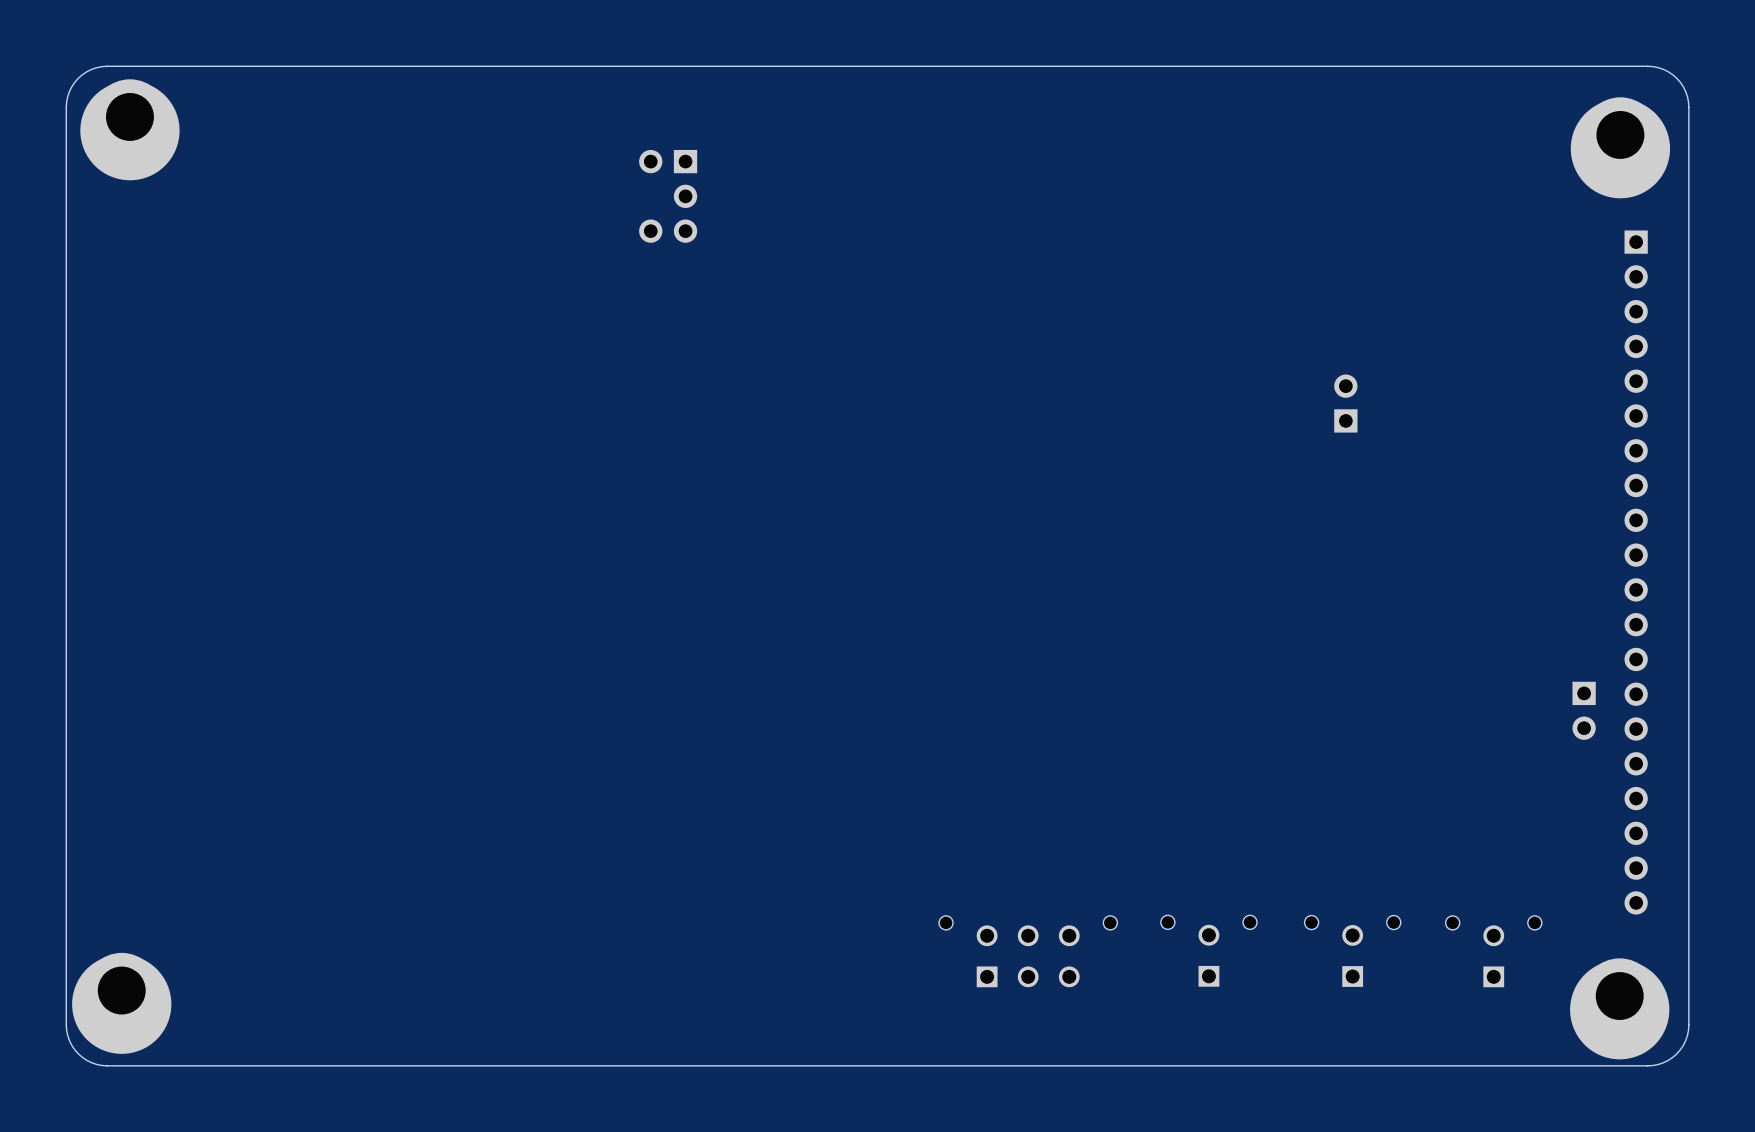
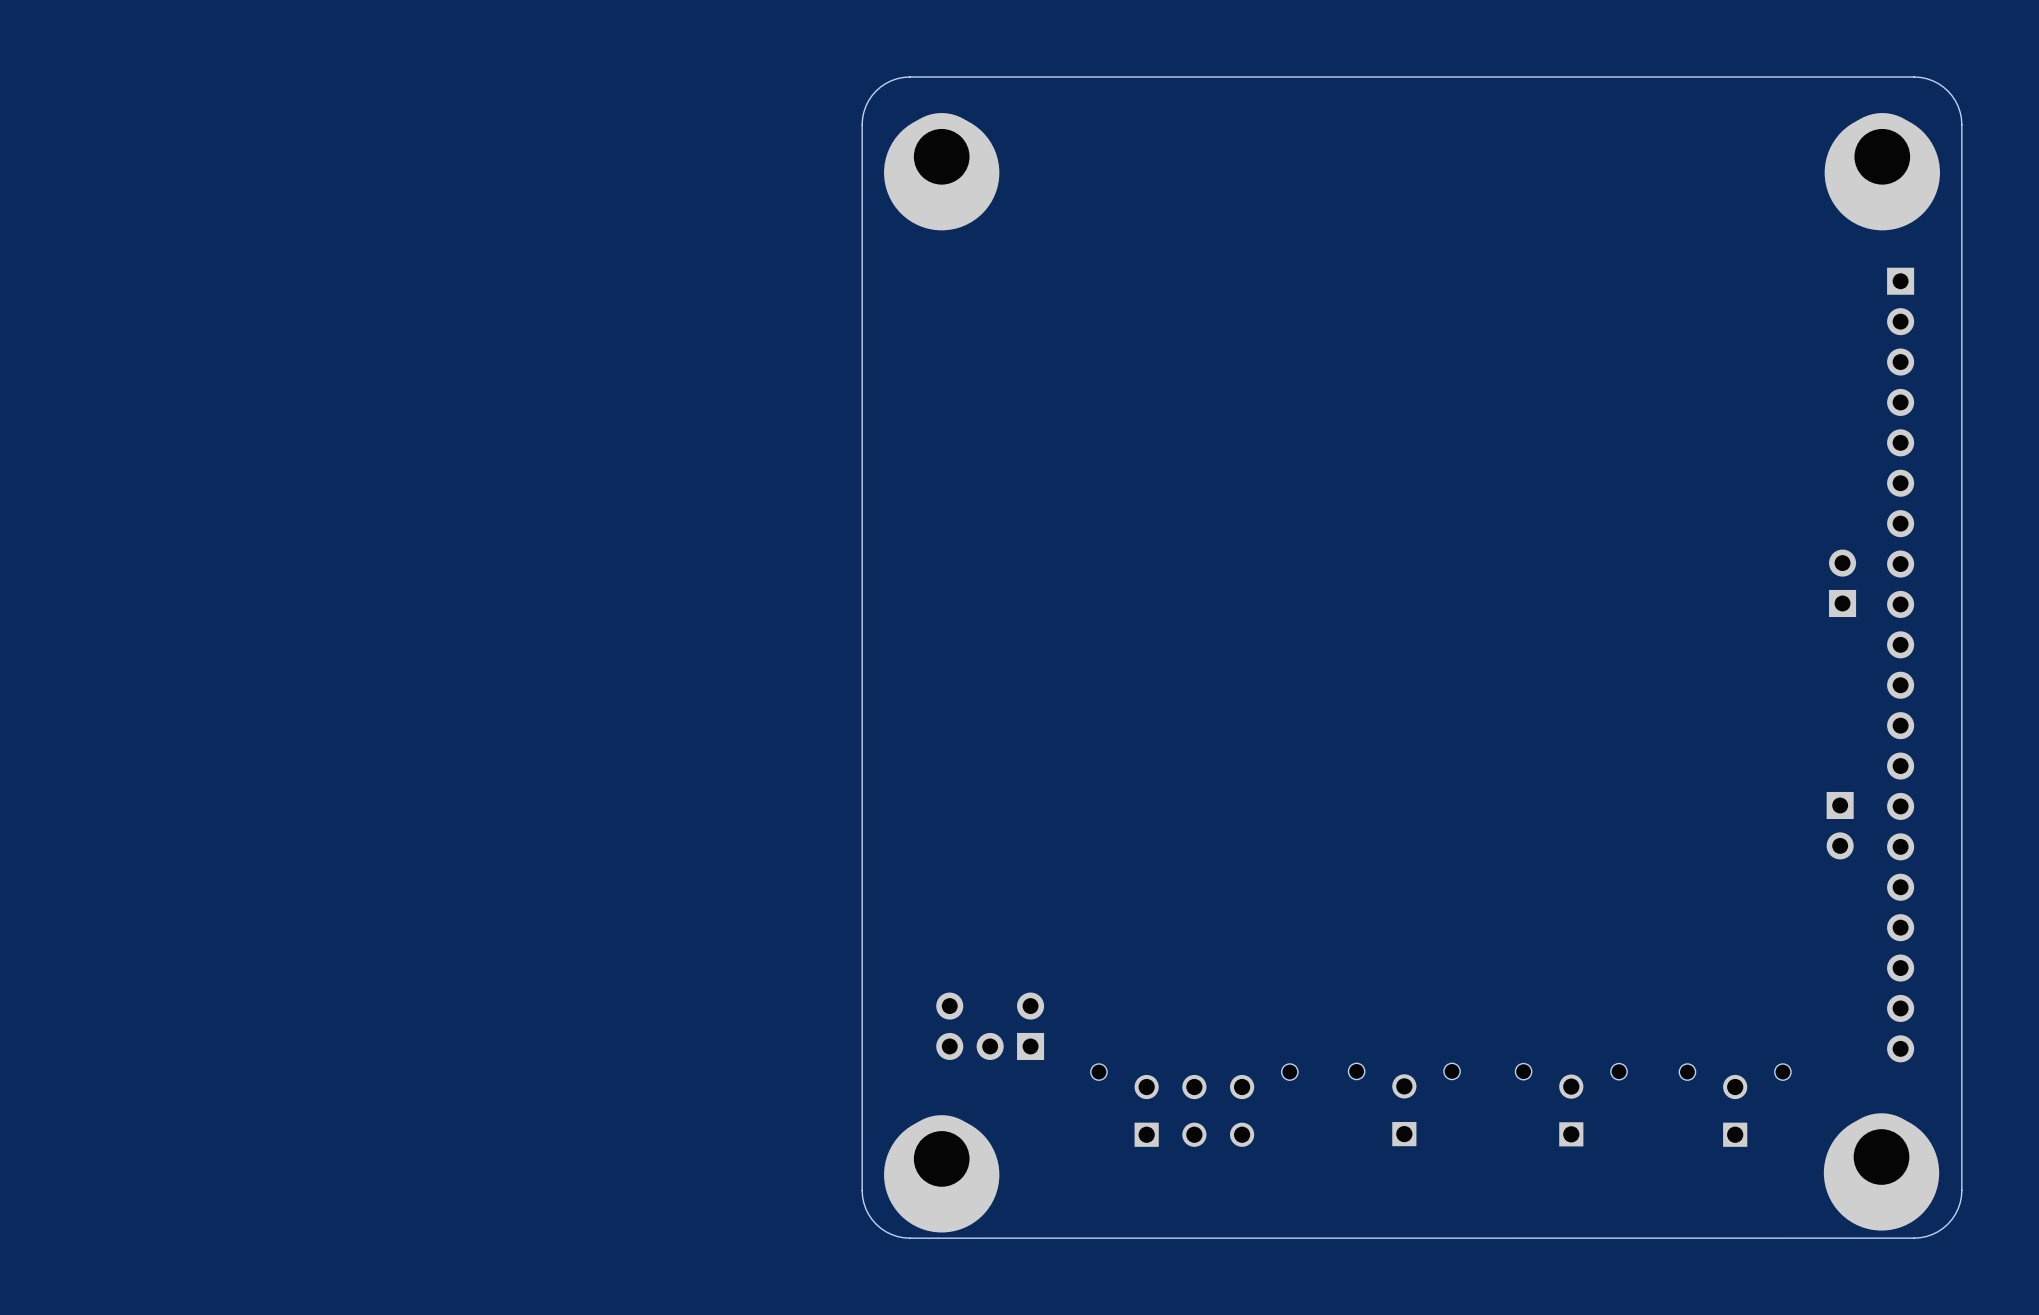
board edge: (783, 66) (107, 66) (91, 69) (74, 82) (69, 91) (66, 107) (66, 1024) (67, 1035) (74, 1049) (86, 1060) (107, 1065) (1647, 1065) -> (909, 77) (891, 80) (876, 90) (865, 106) (862, 124) (862, 1190) (865, 1208) (872, 1219) (880, 1228) (891, 1234) (909, 1238) (1914, 1238)
part: (129, 129) -> none
part: none -> (941, 171)
part: (668, 196) -> none
part position: (1345, 403) -> (1842, 583)
part: none -> (990, 1026)
part: (121, 1003) -> none
part: none -> (941, 1173)

